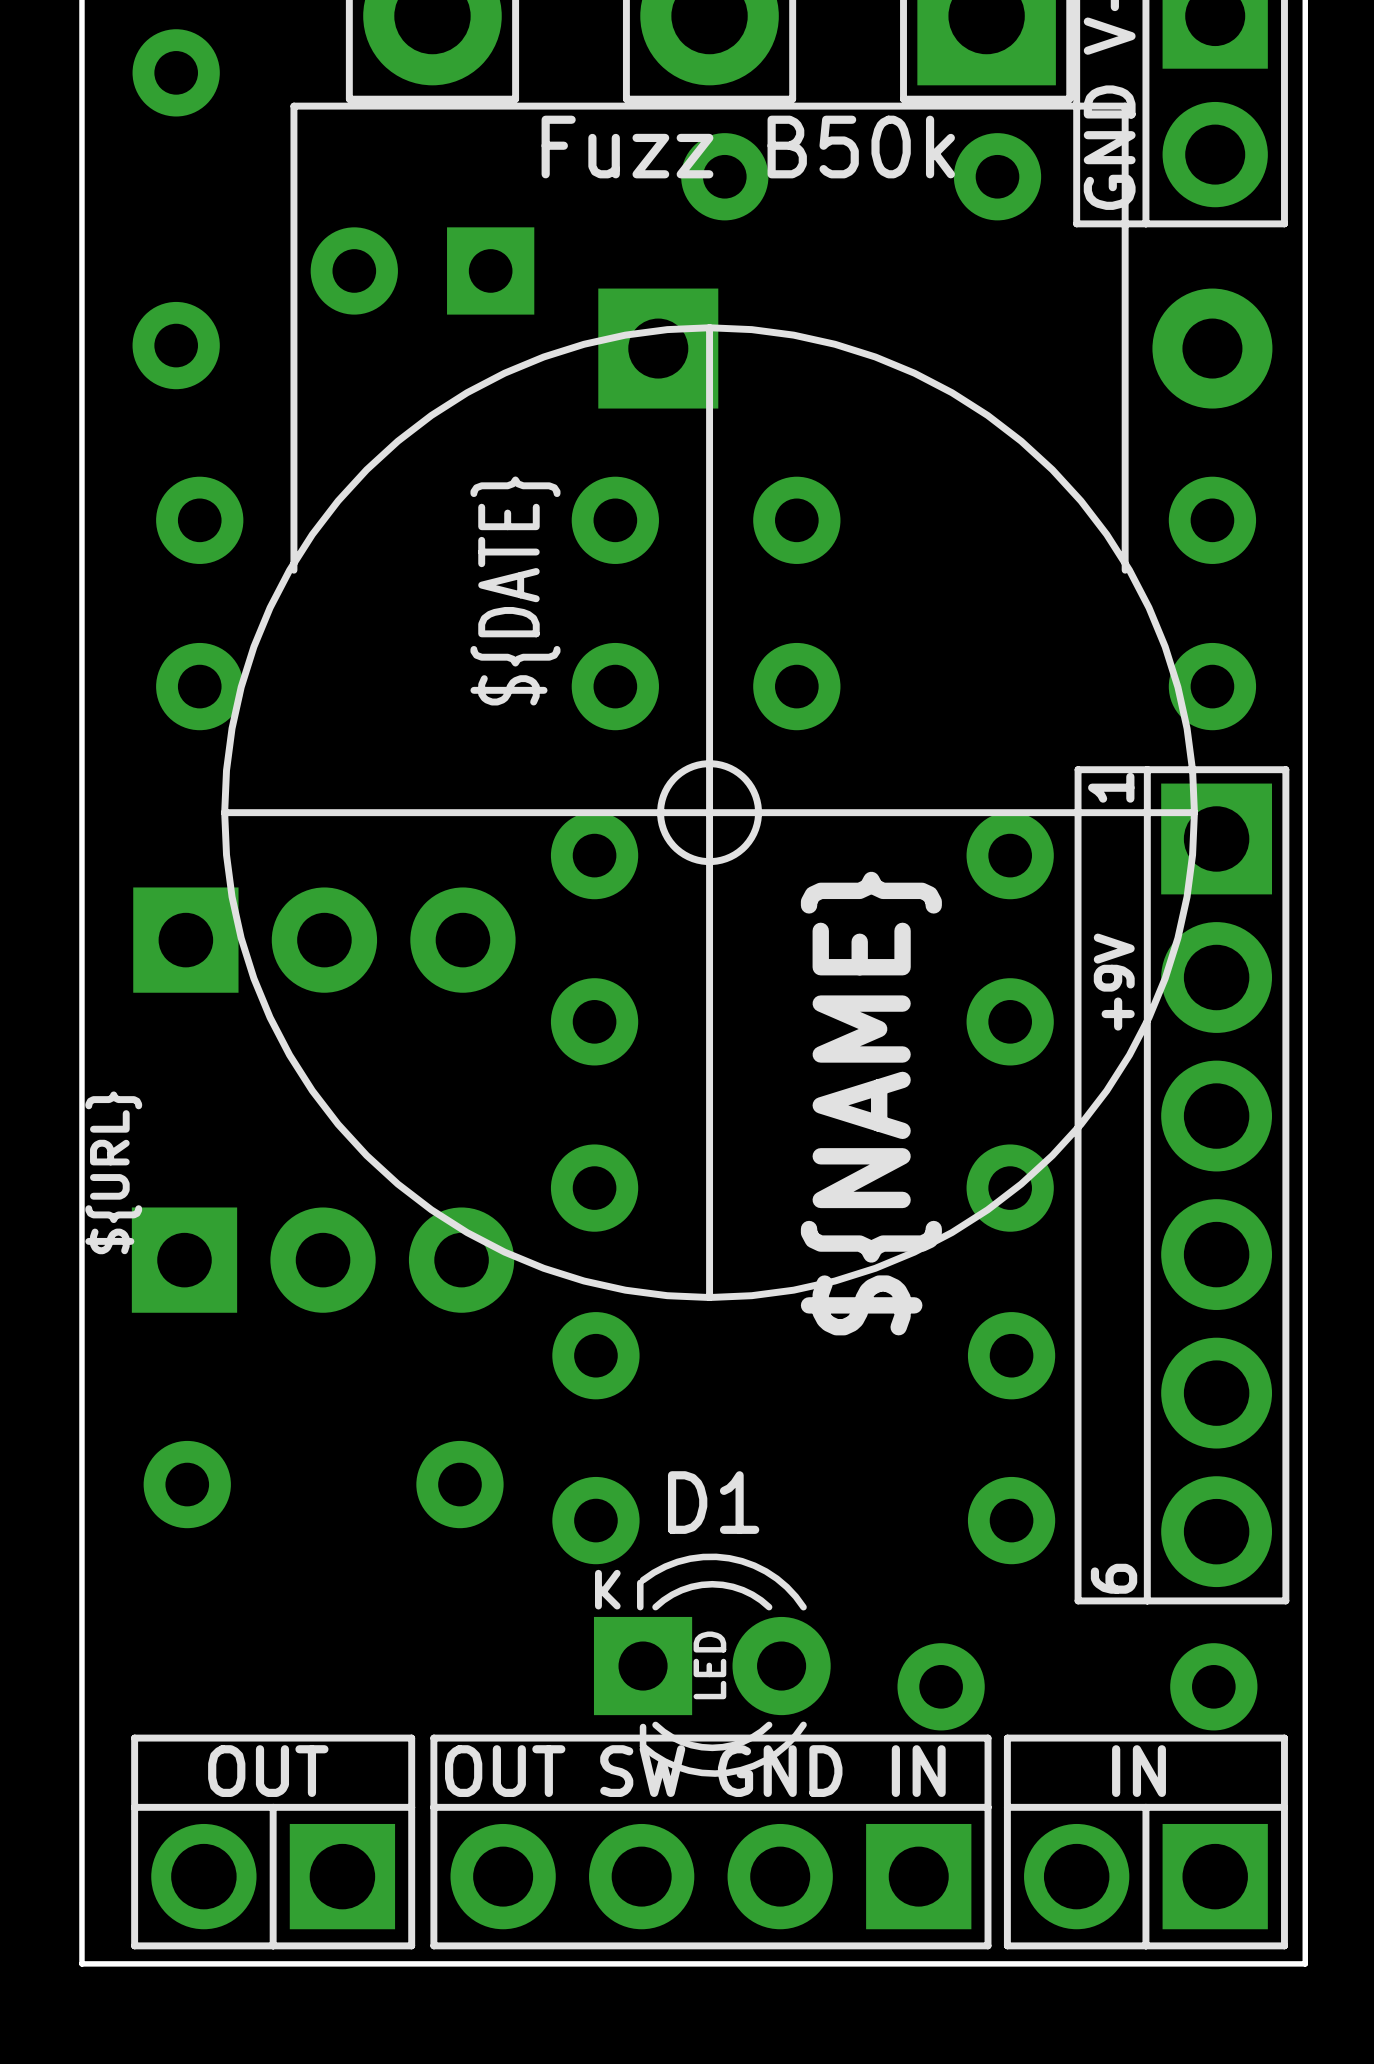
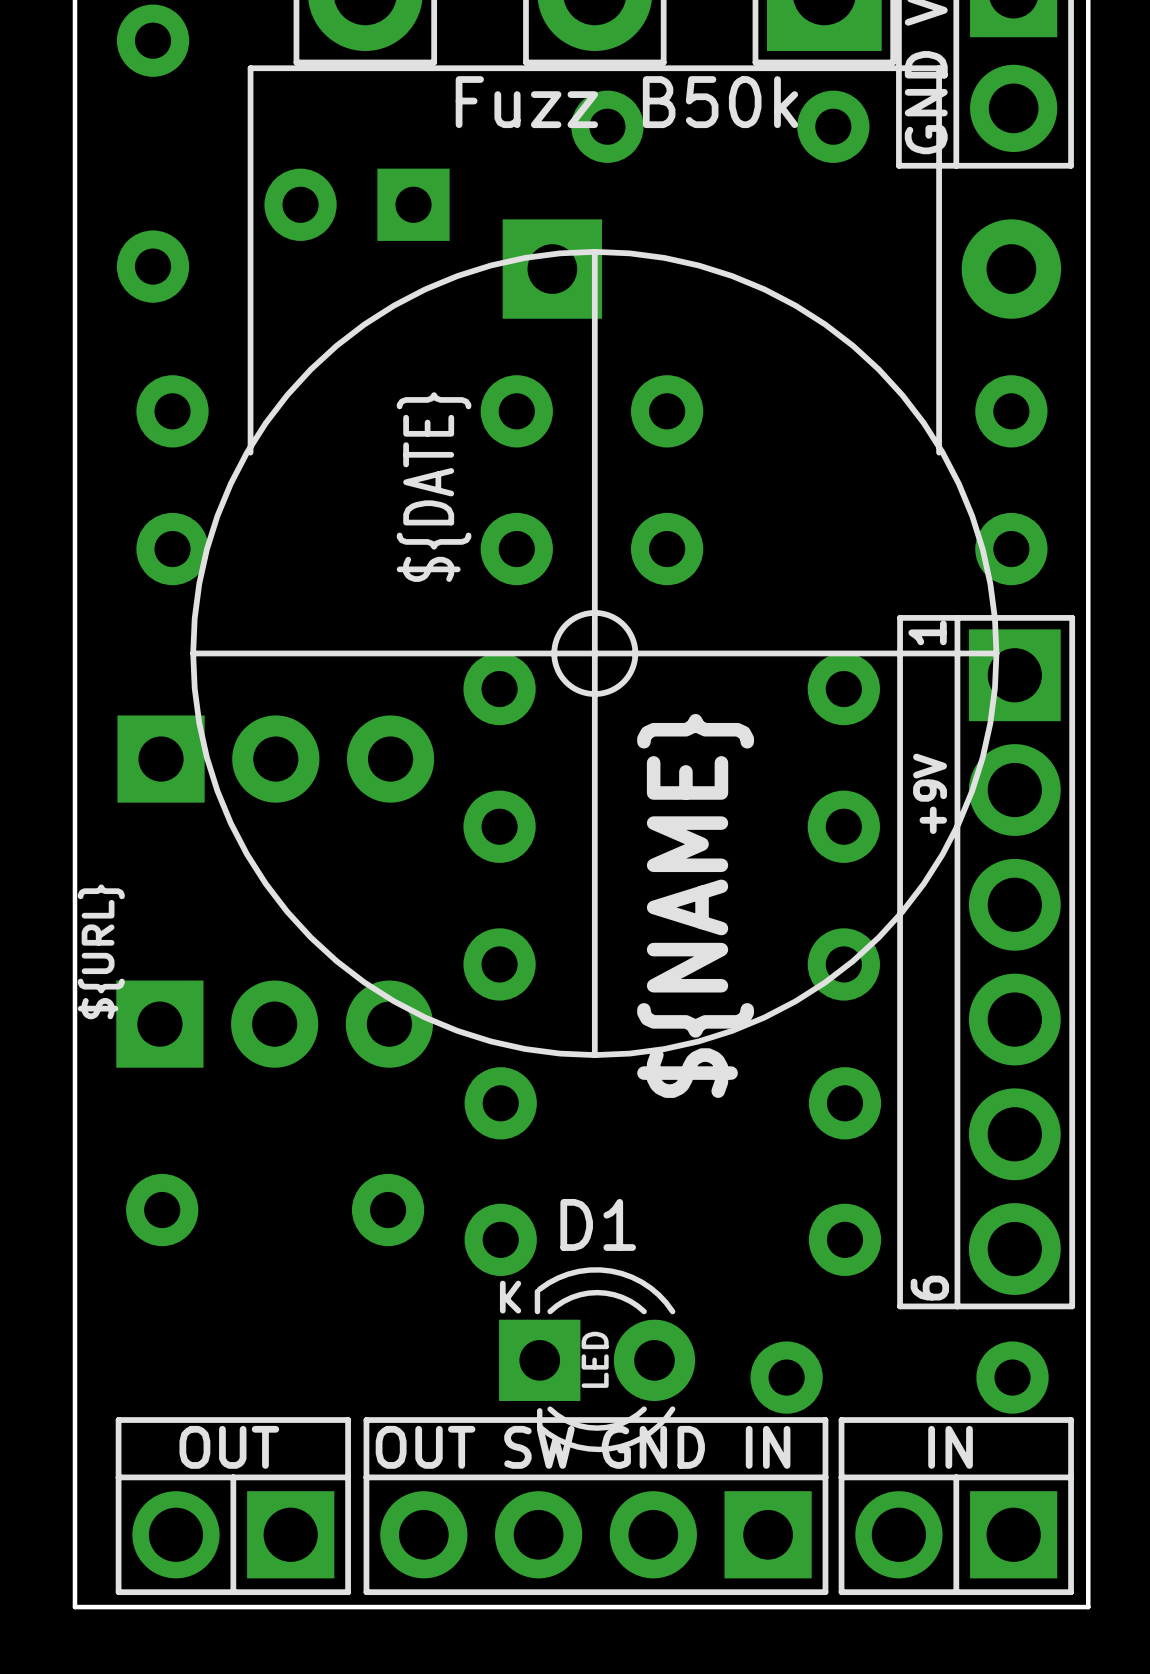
text position: ${DATE} (515, 590) -> ${DATE} (434, 487)
text position: ${NAME} (871, 1103) -> ${NAME} (695, 905)

